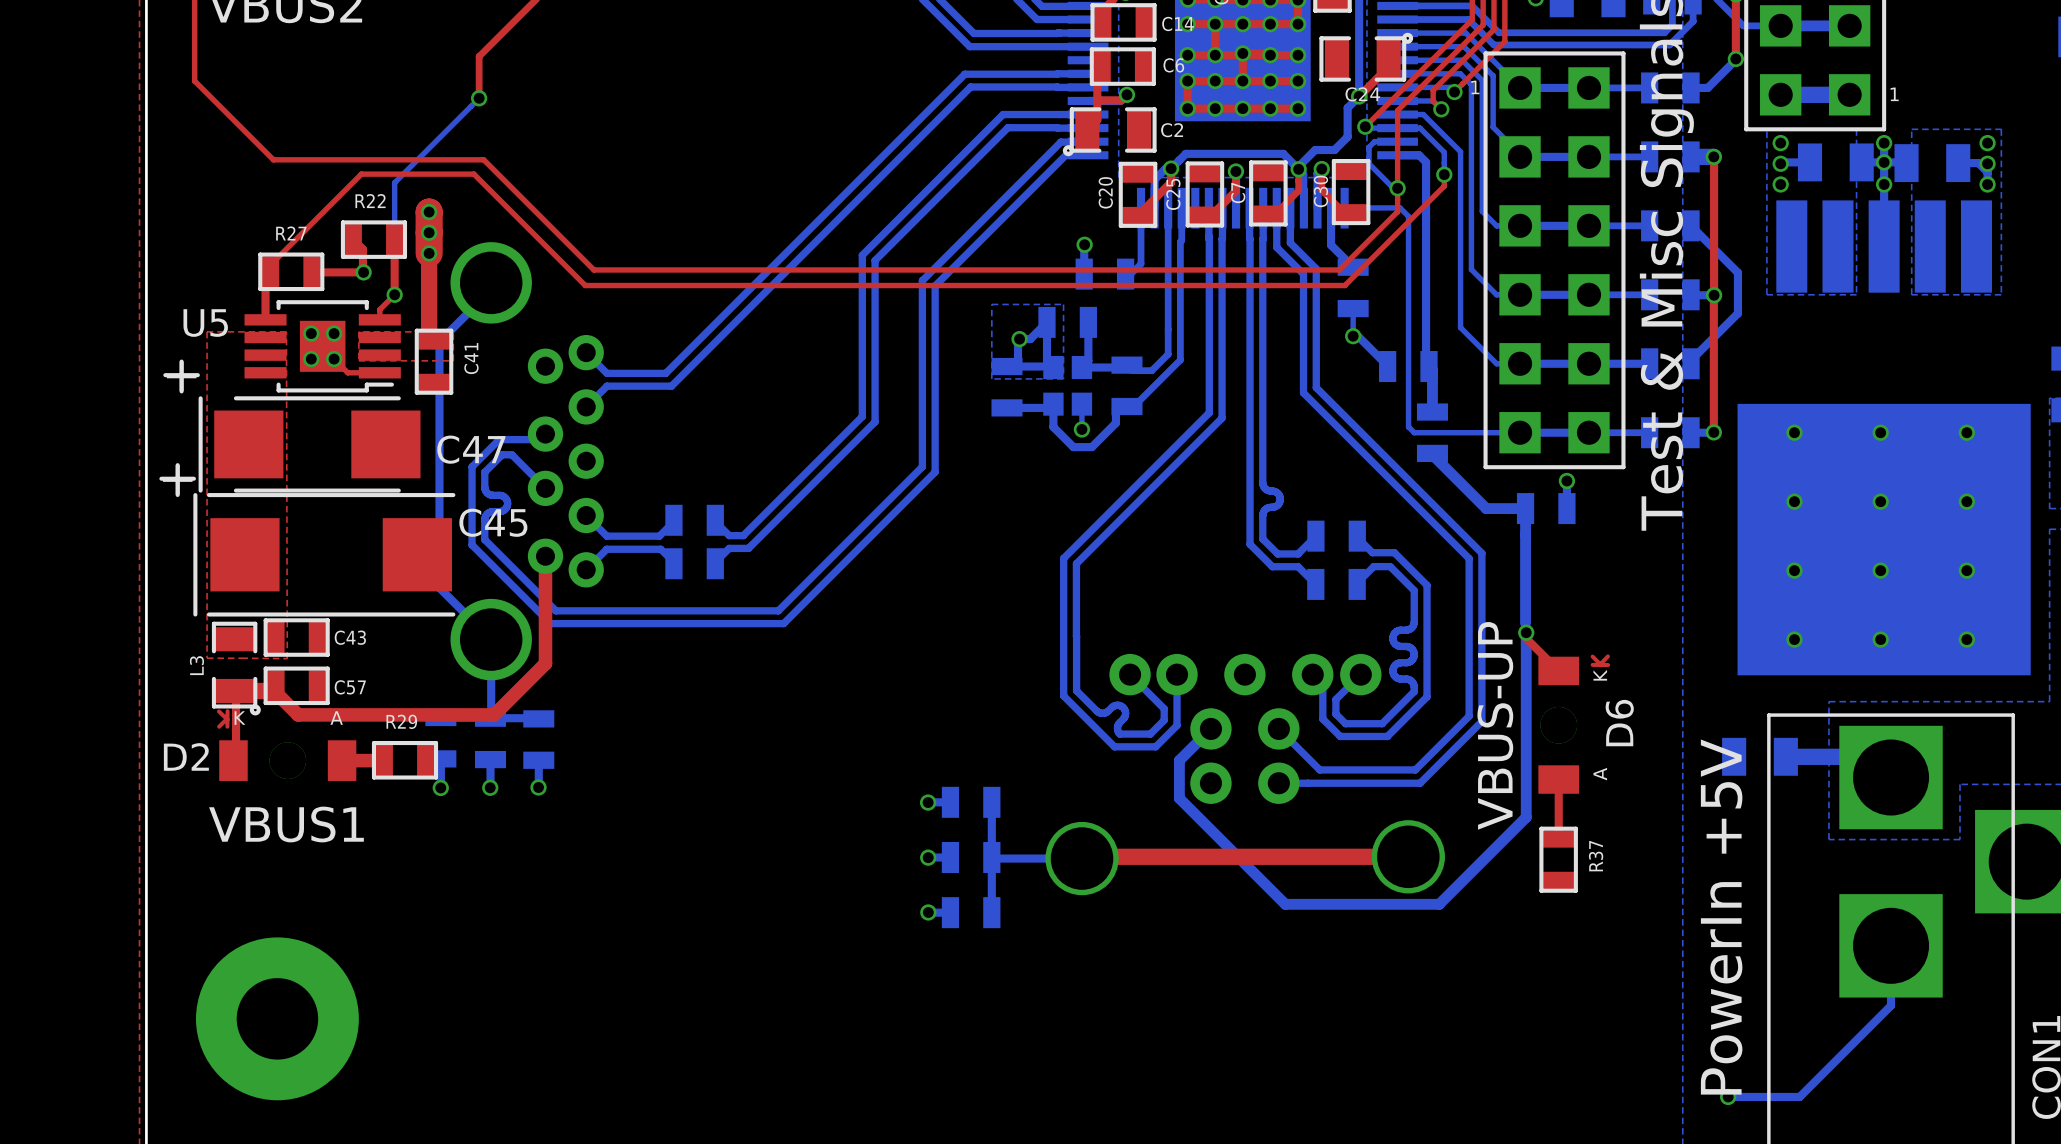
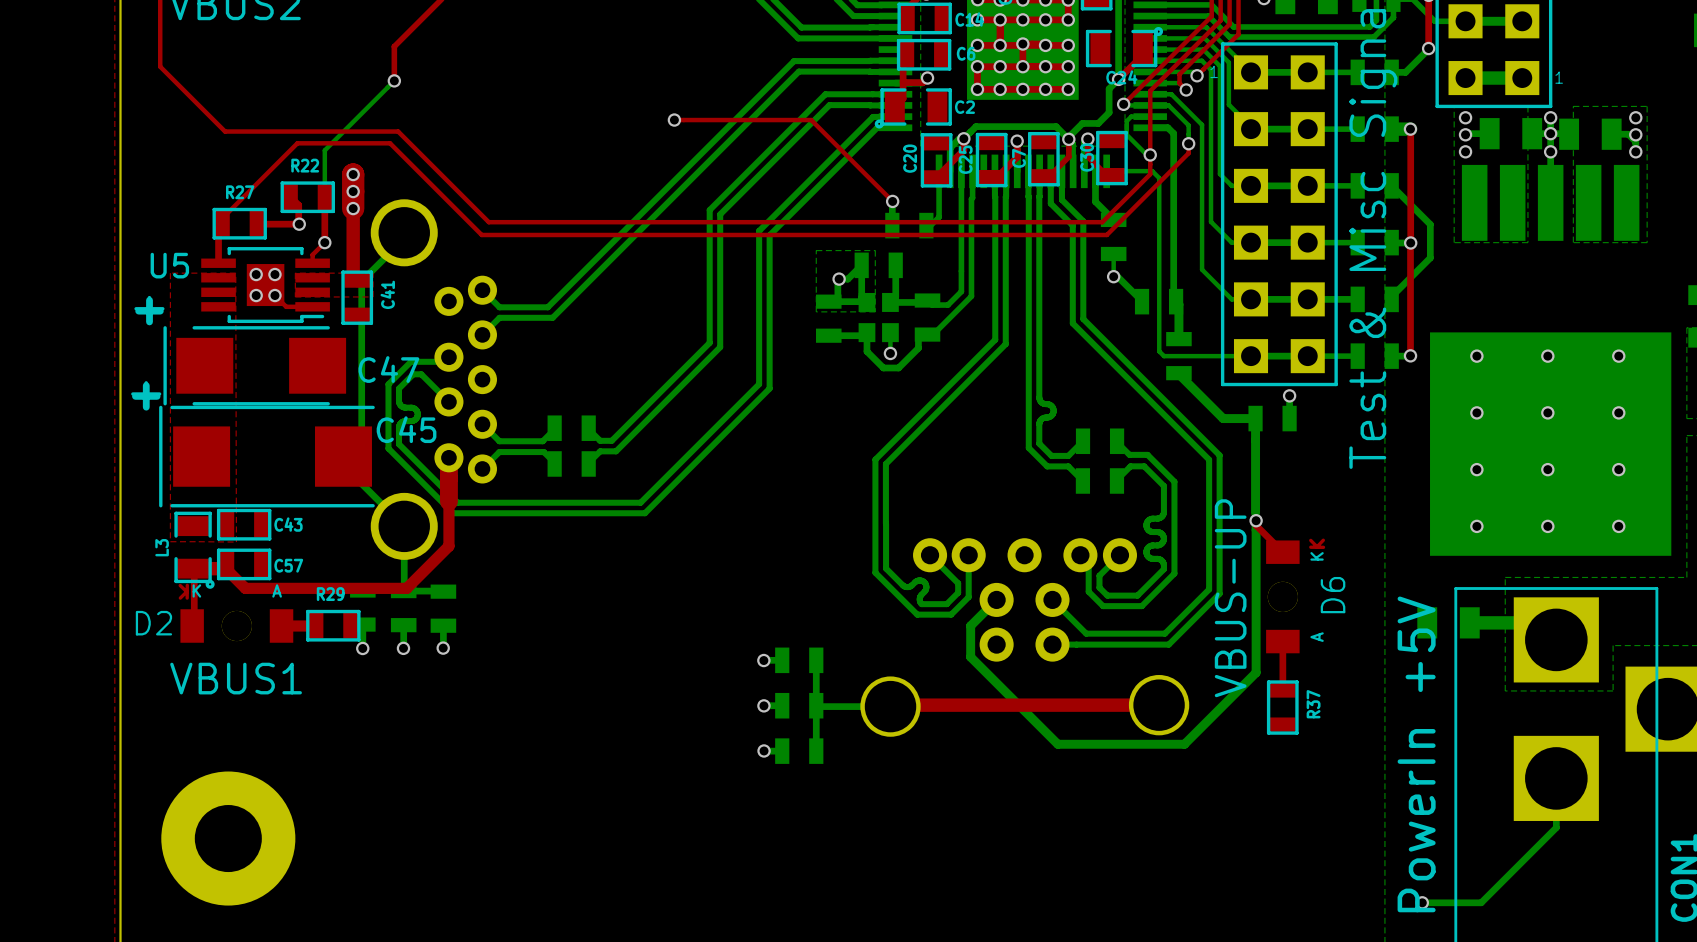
top track: none -> (674, 120) (811, 120) (892, 201)
via: none -> (674, 120)
top track width: thin (545, 556) (545, 609) -> thick (448, 457) (448, 501)

